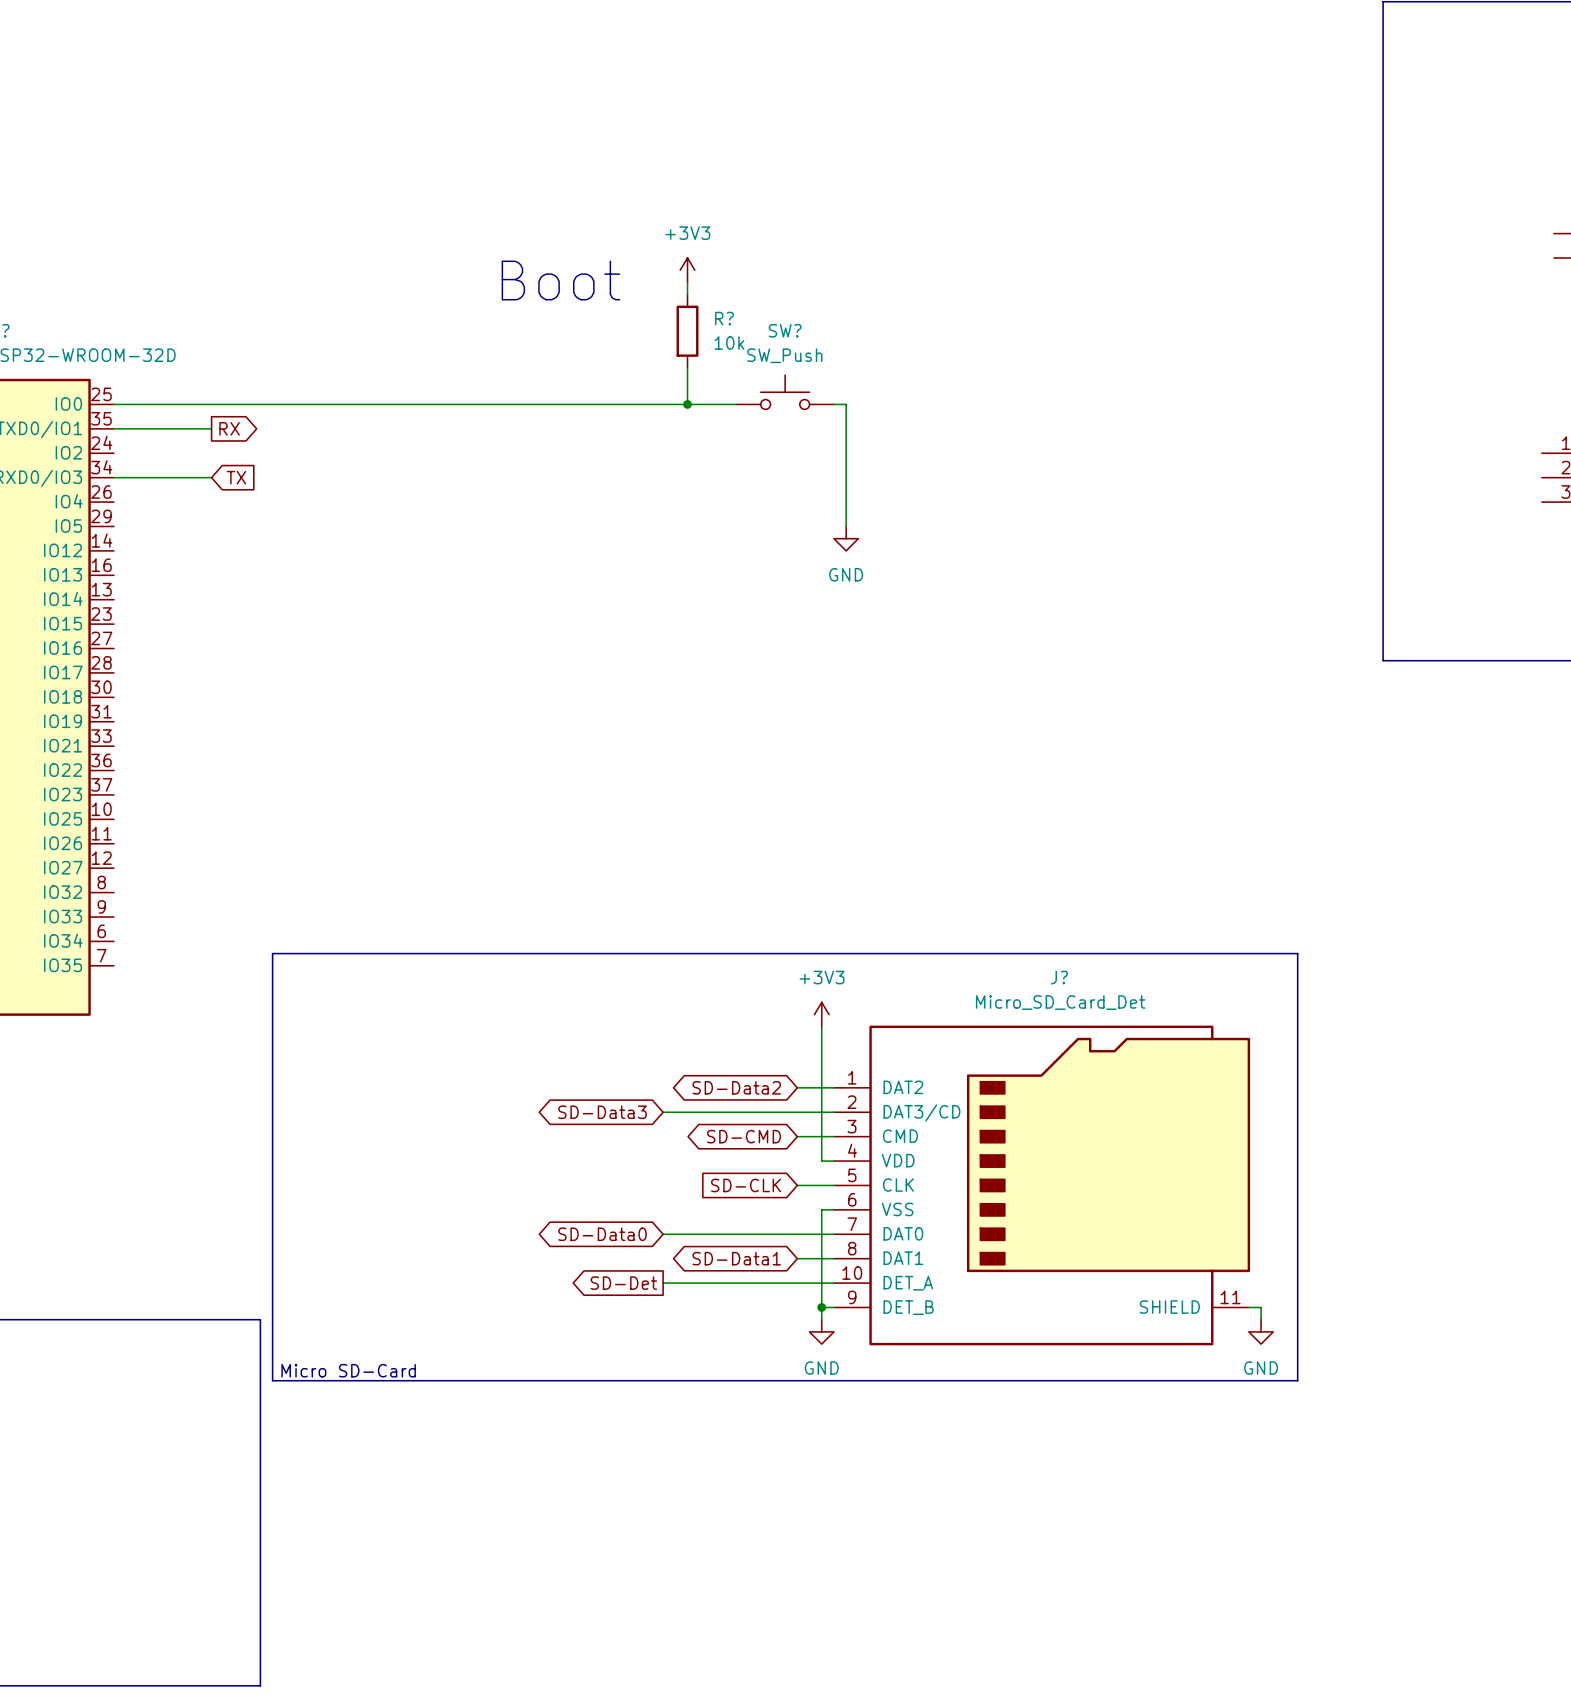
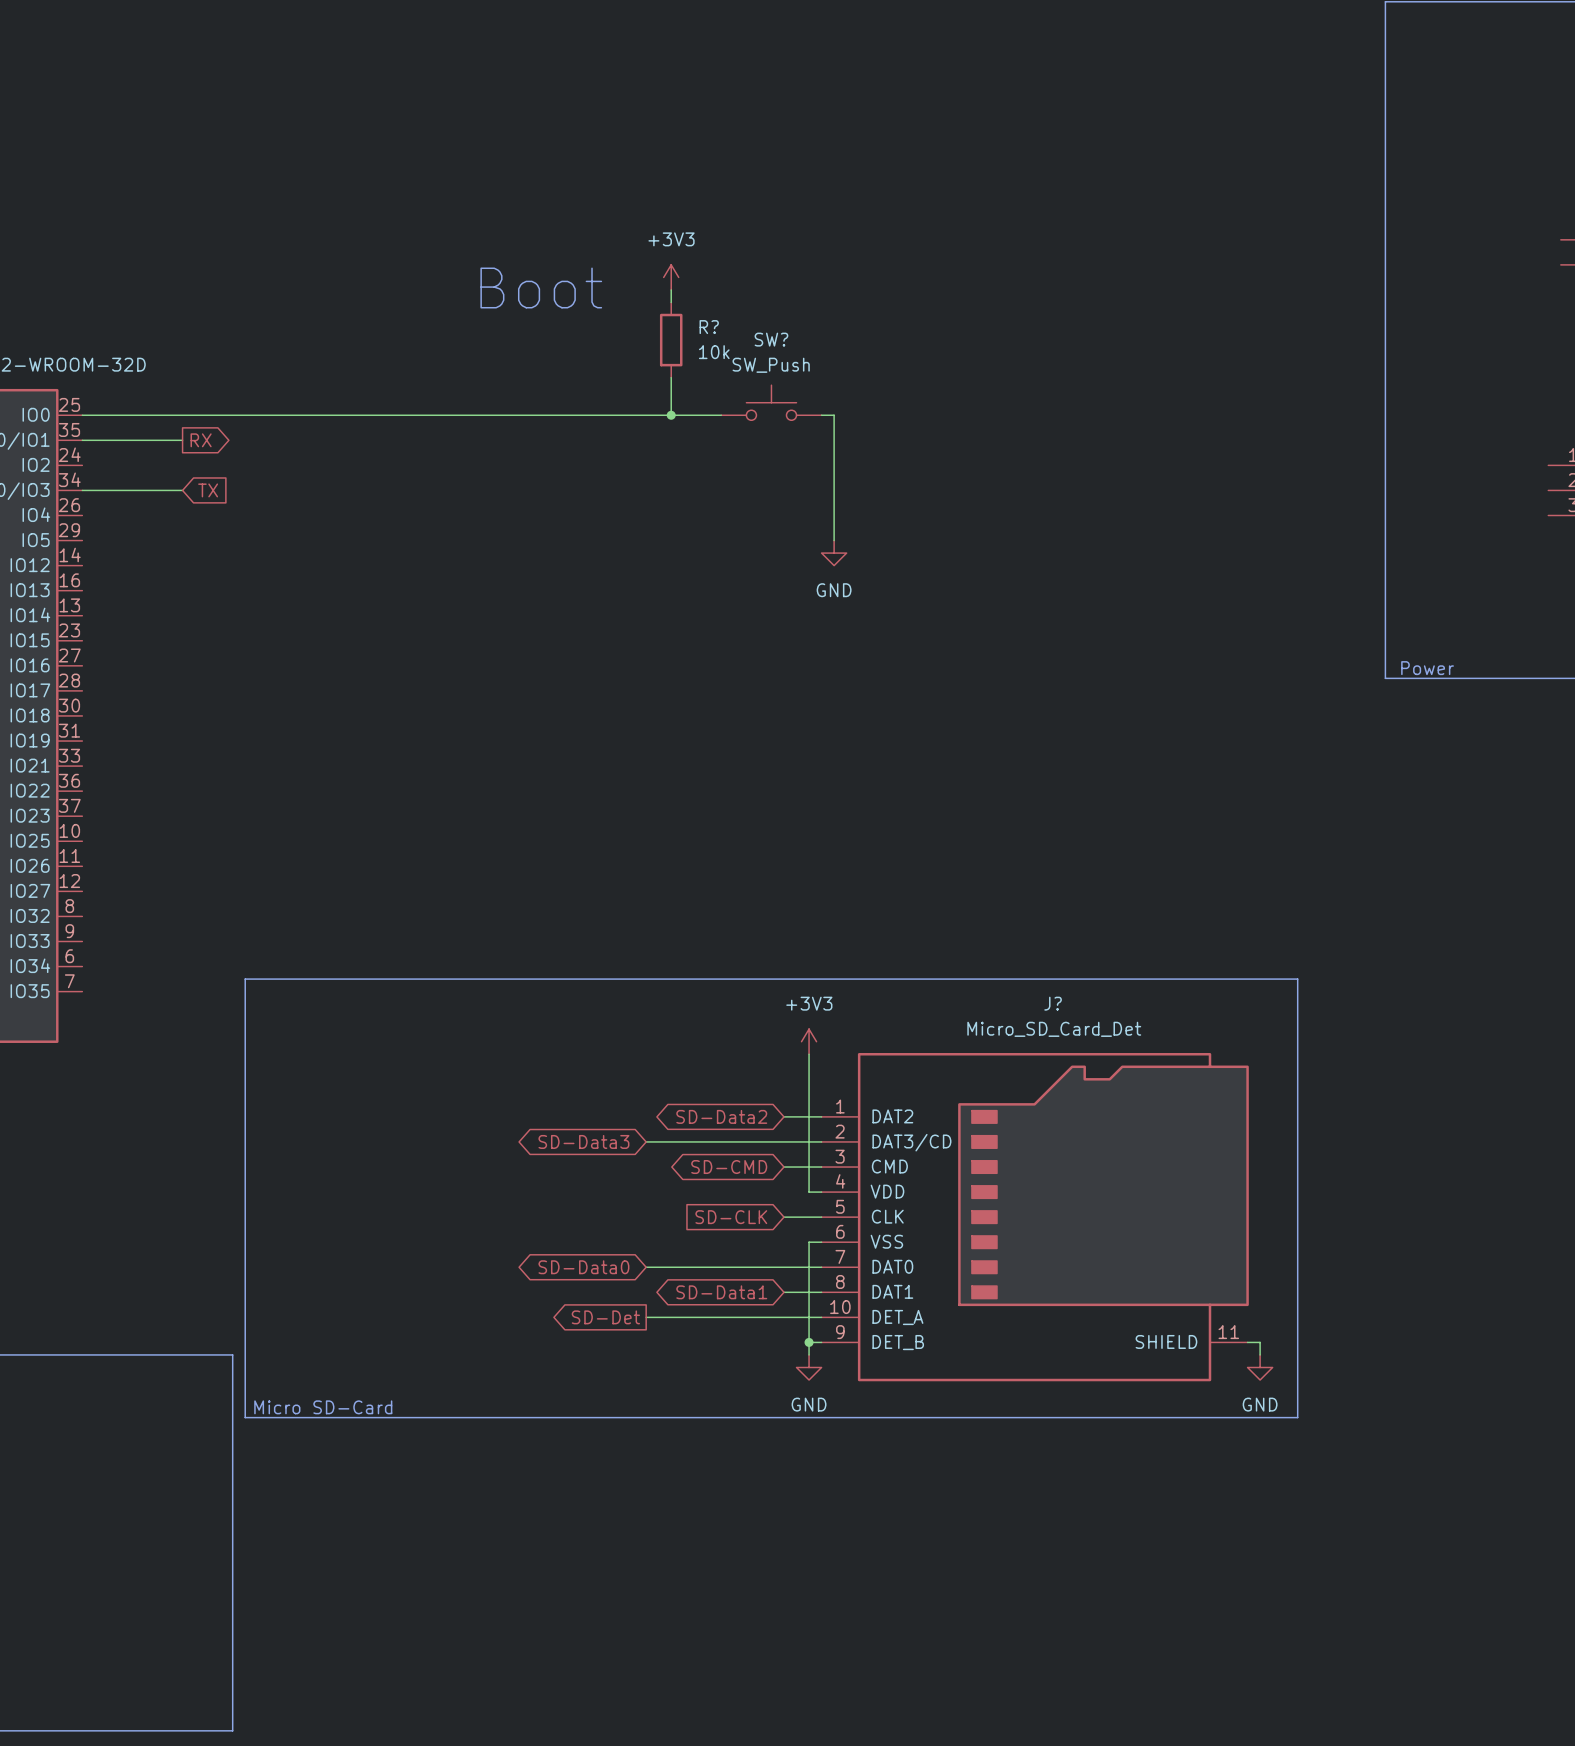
text: none -> Power (1427, 668)

